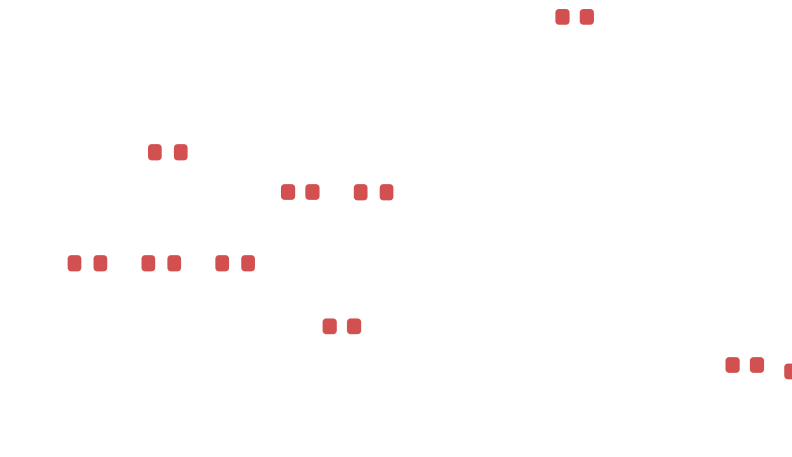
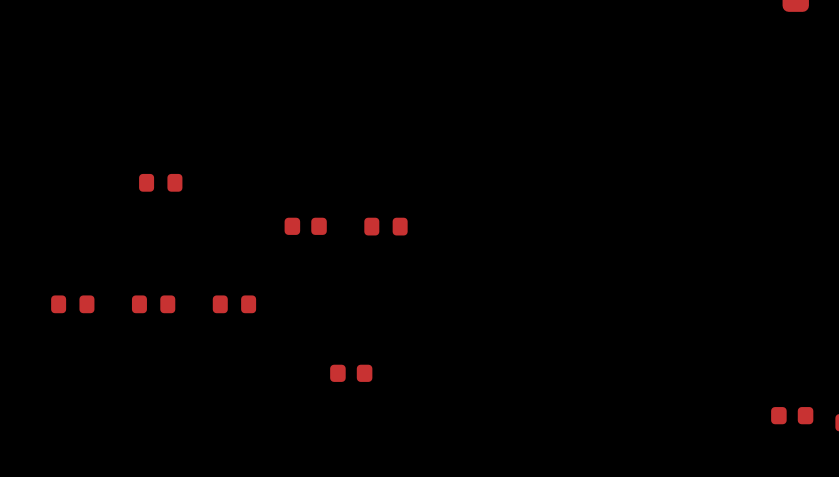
part: (574, 16) -> none

